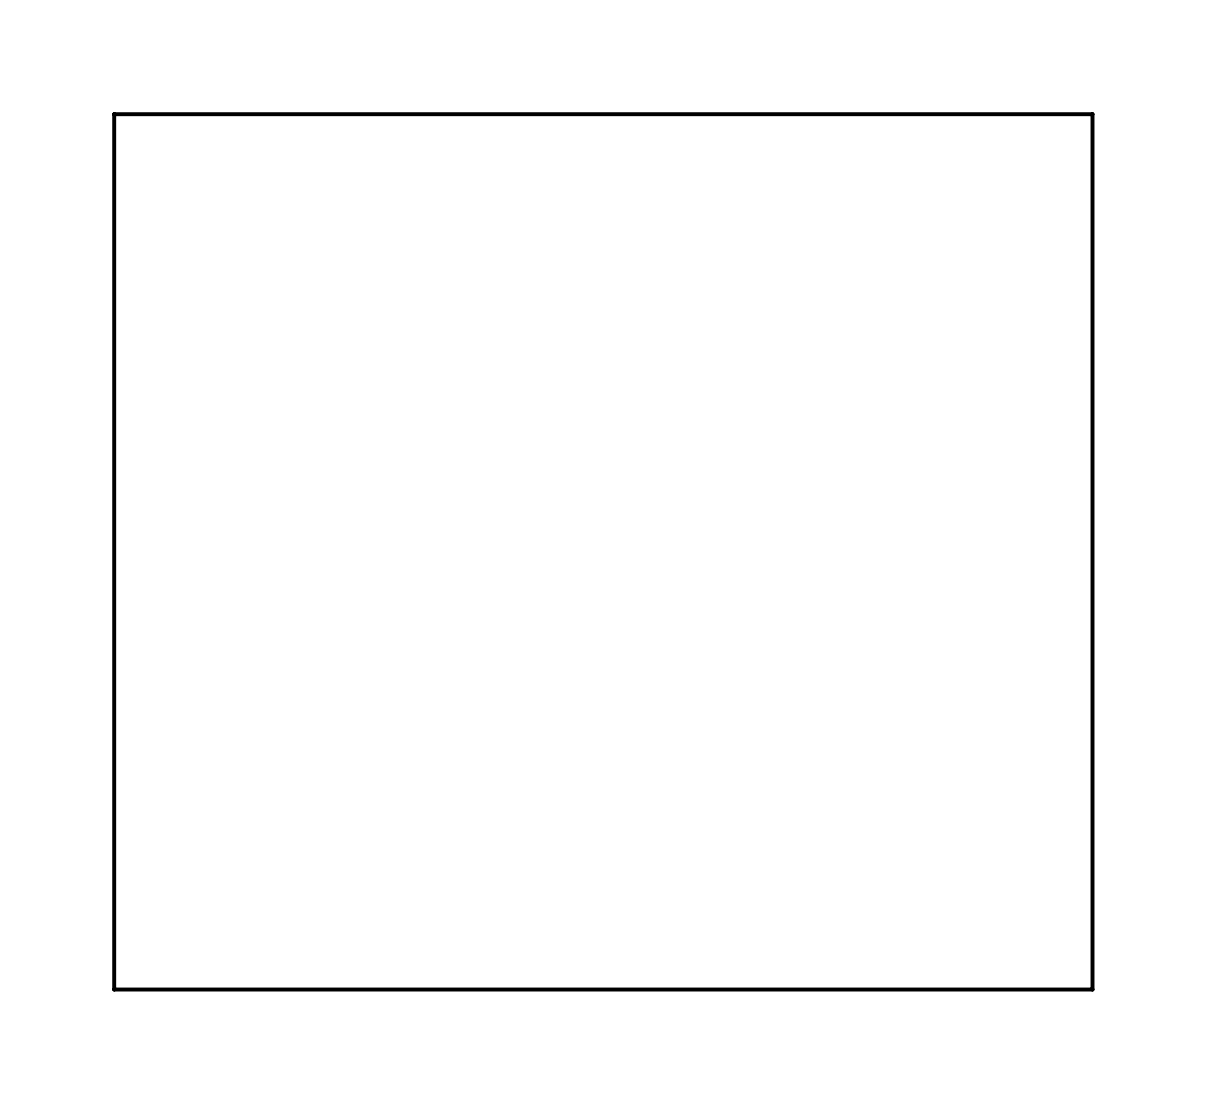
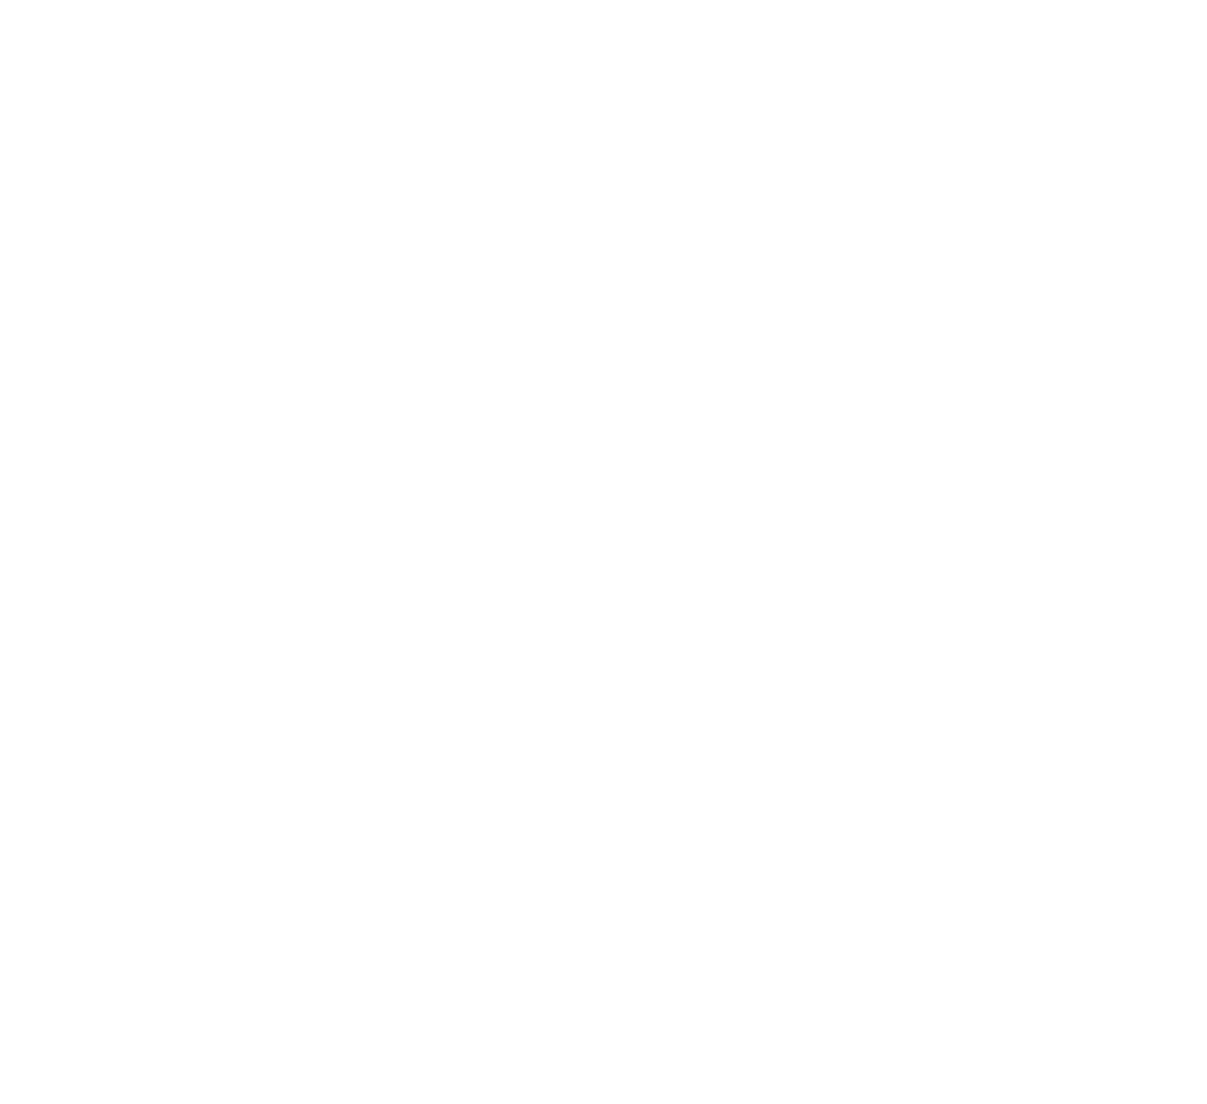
board edge: (1092, 114) (1092, 989) (114, 989) (114, 114) (1092, 114) -> none

